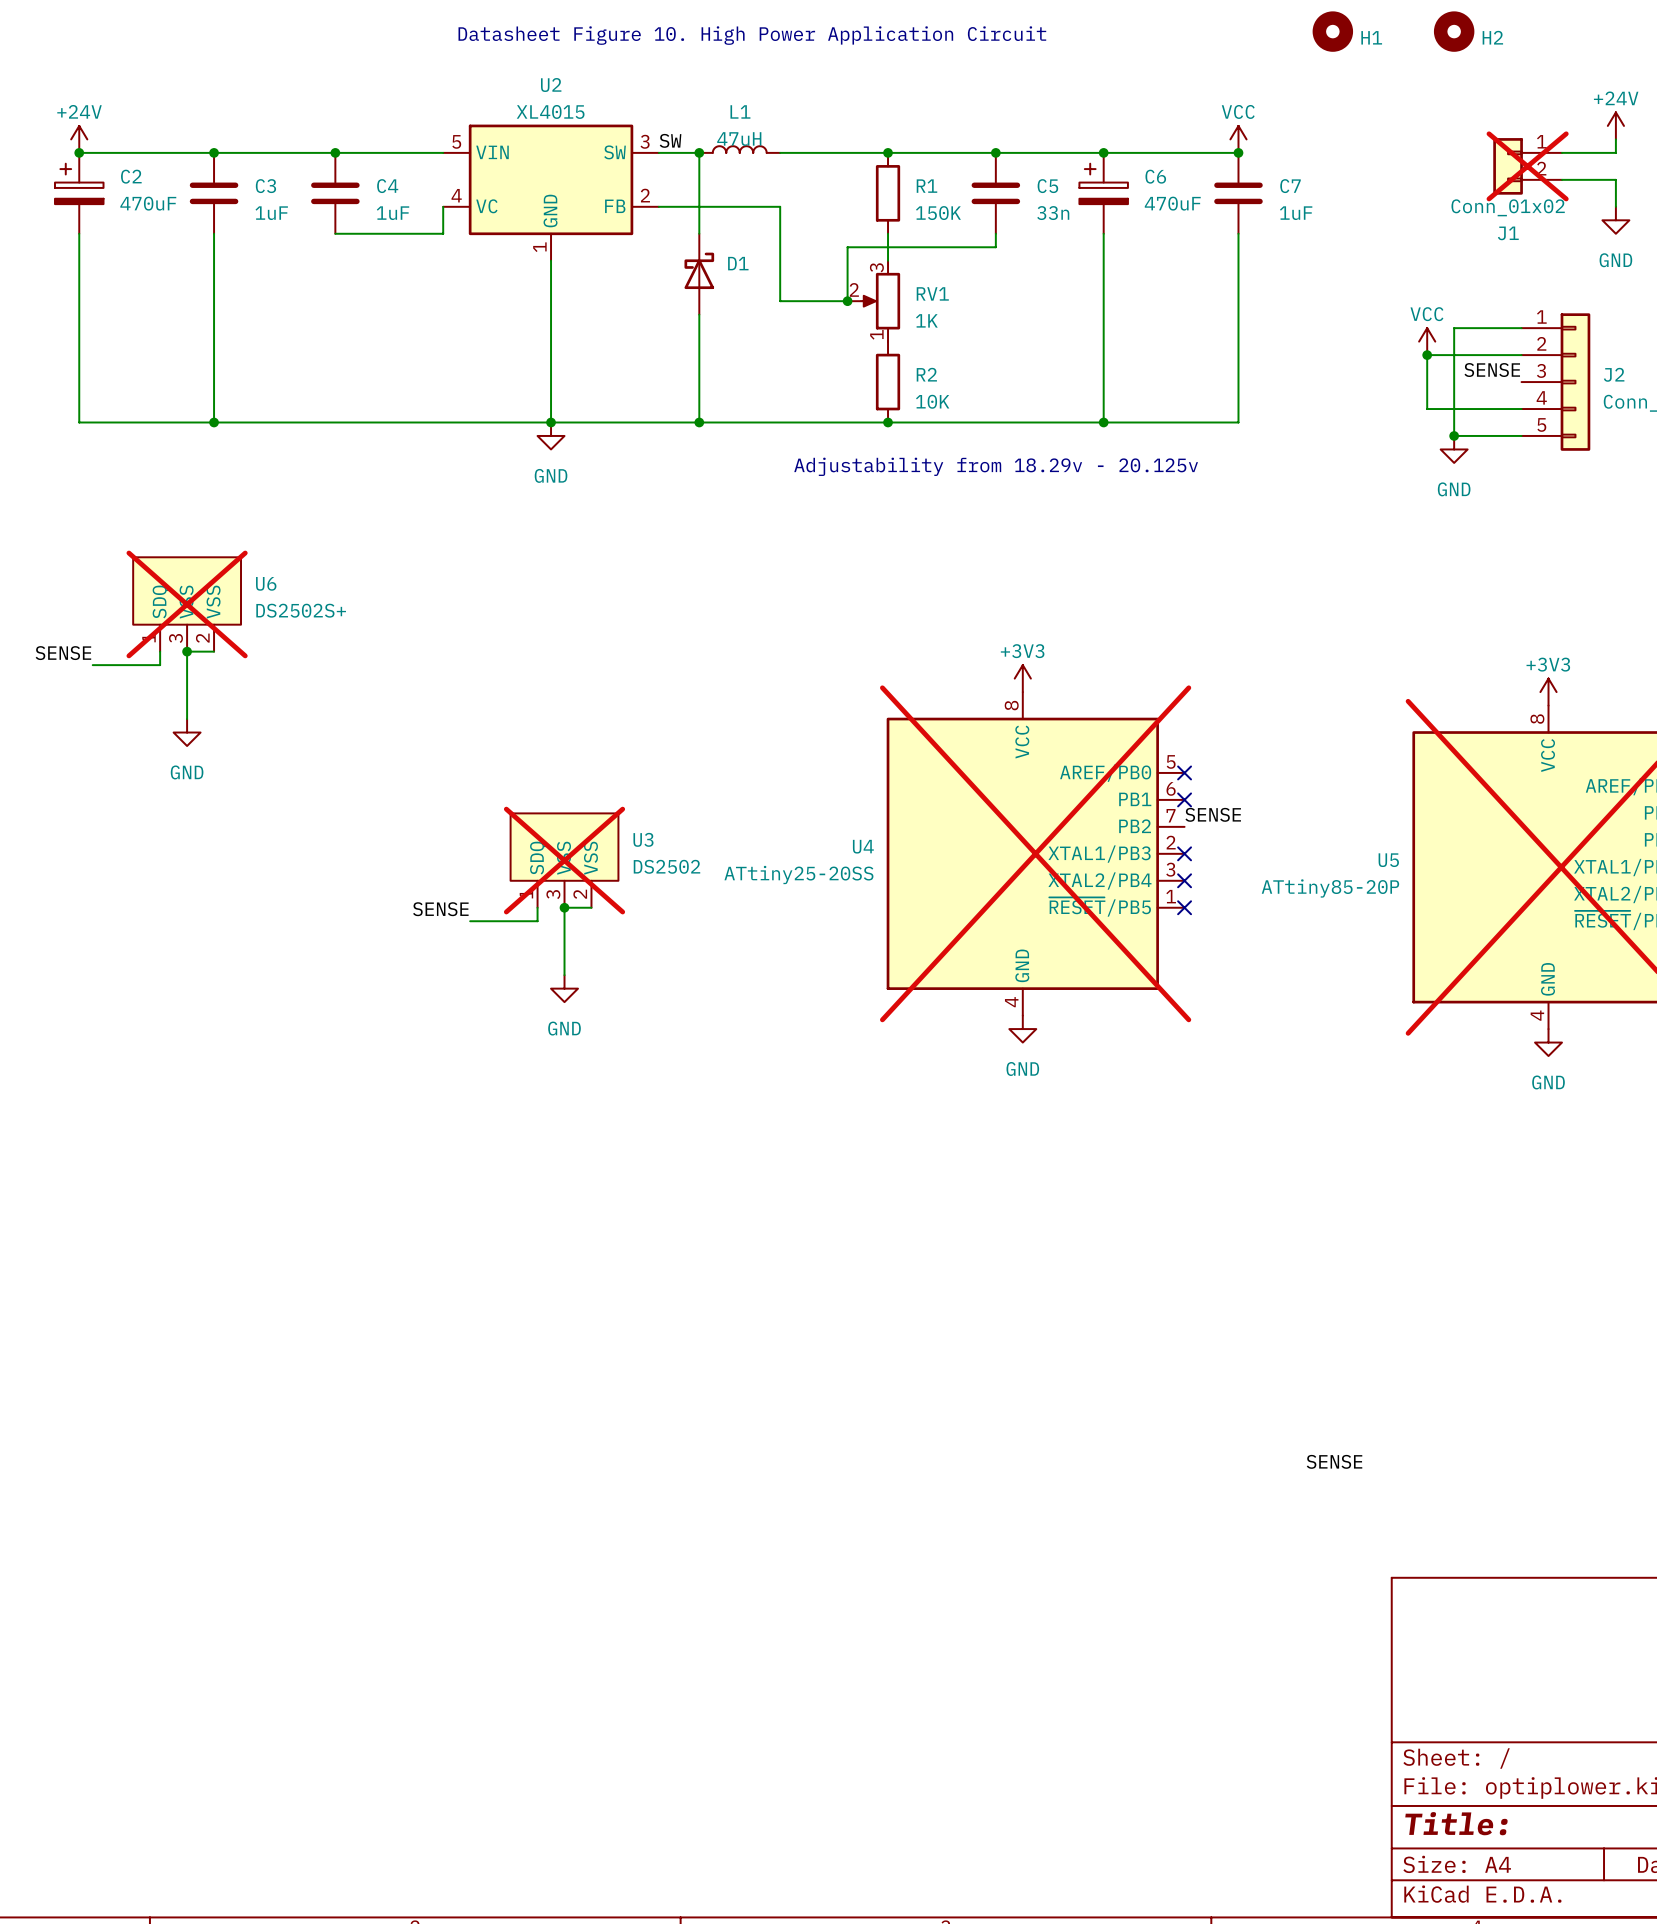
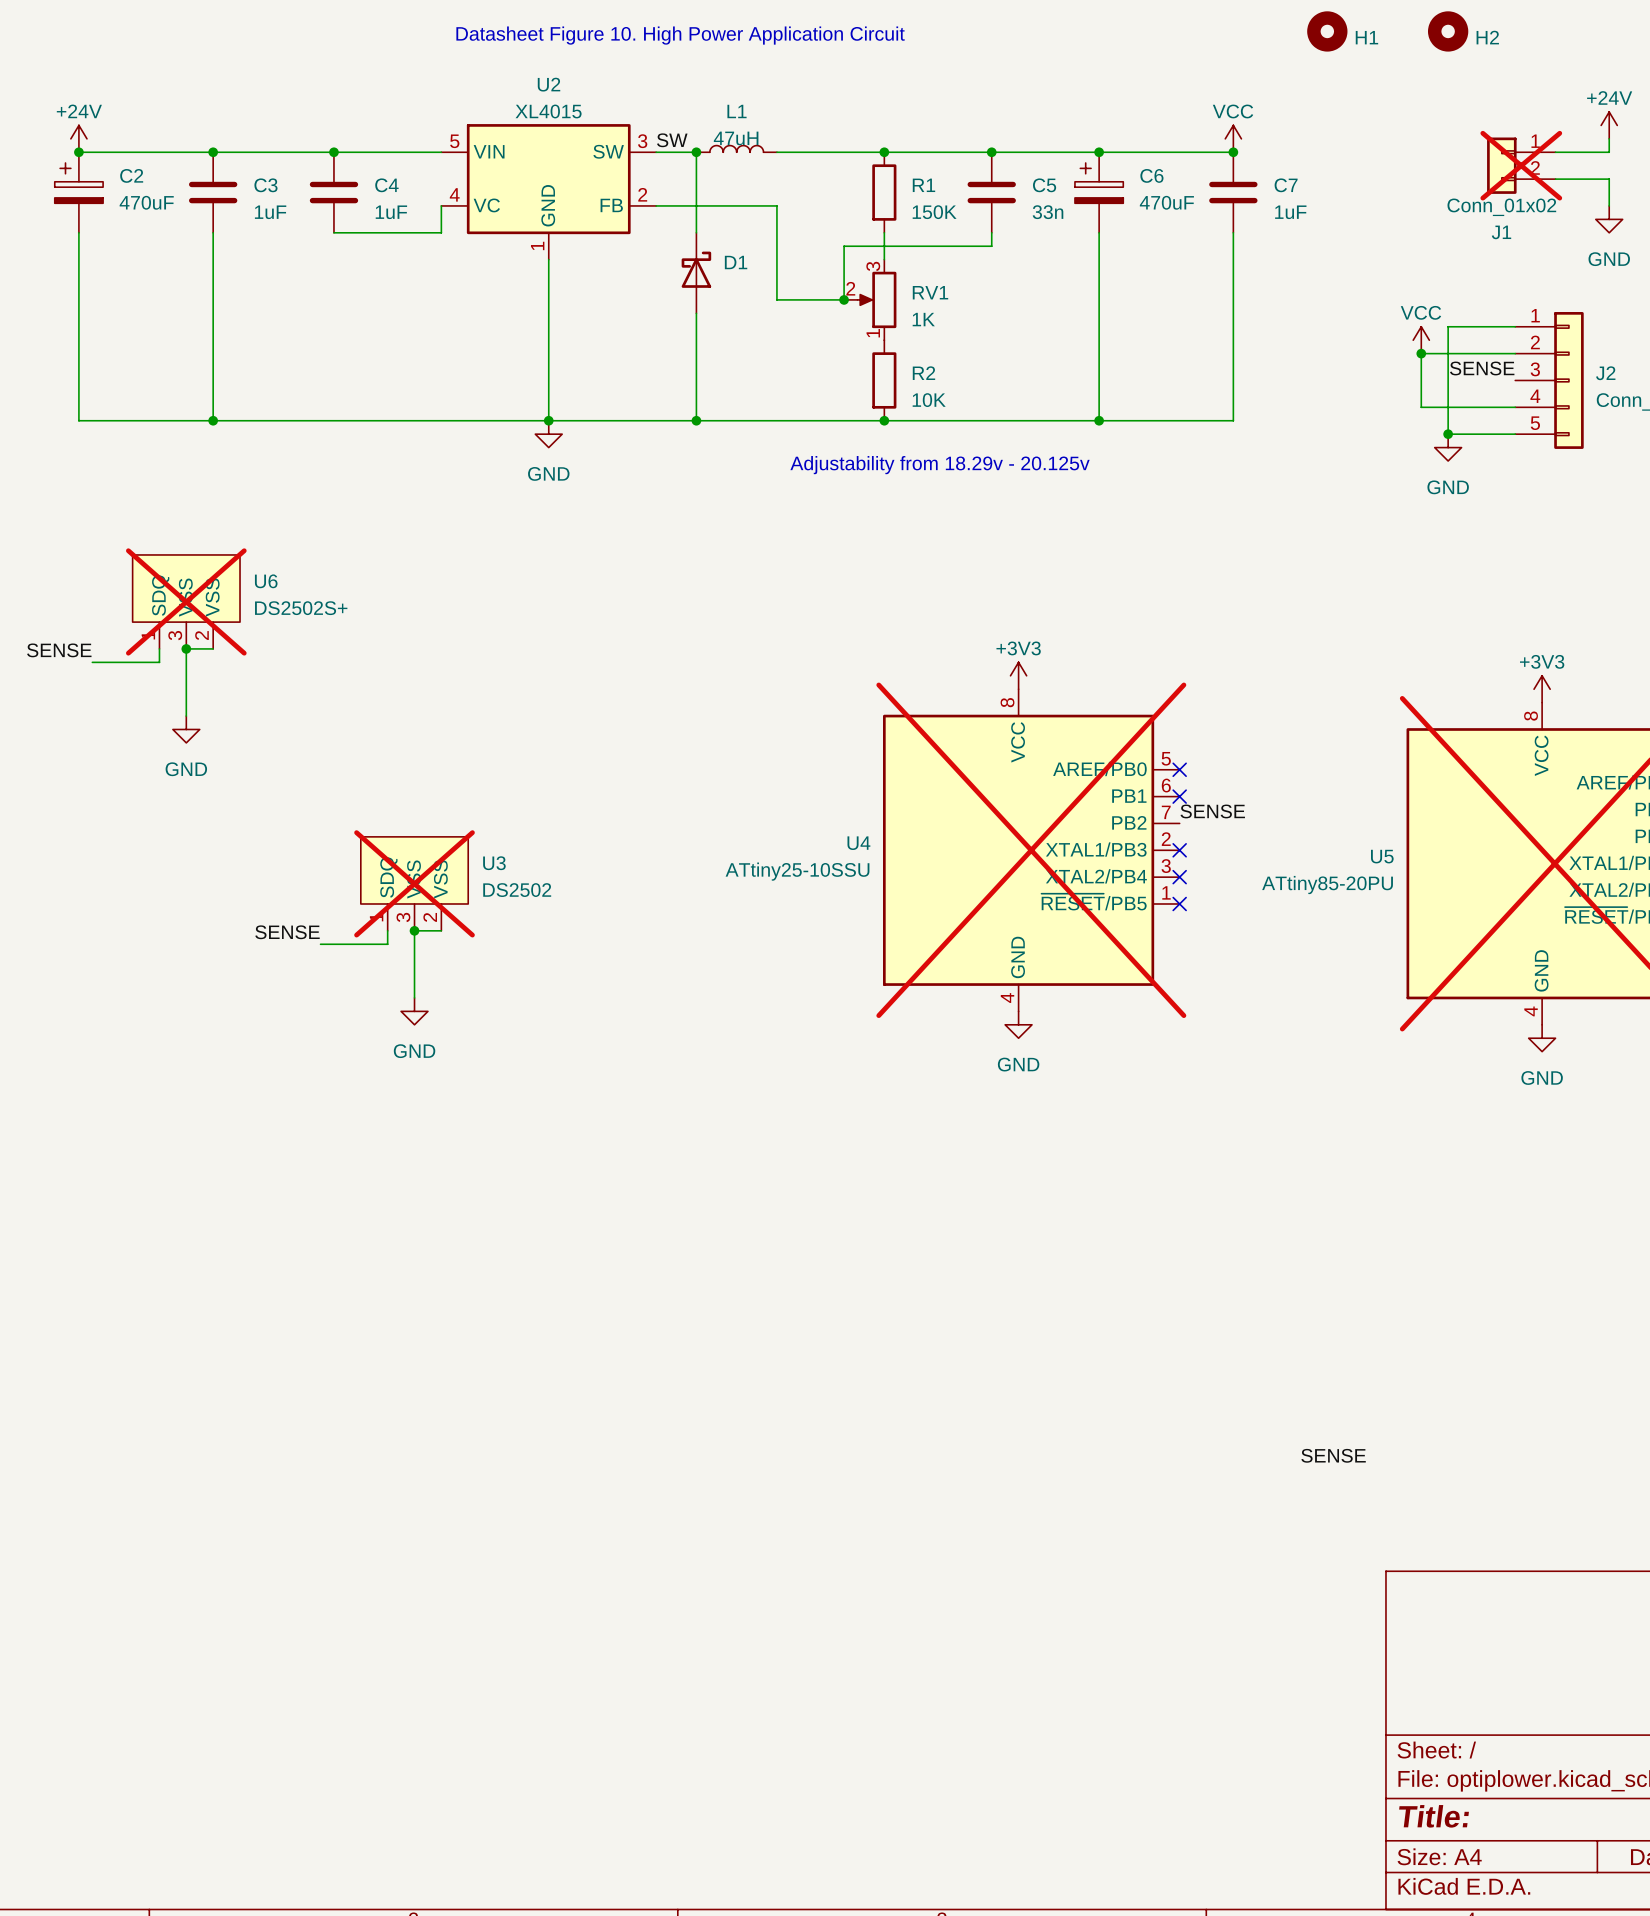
U3 position: (564, 860) -> (414, 883)
U4 value: ATtiny25-20SS (798, 874) -> ATtiny25-10SSU (797, 871)
U5 value: ATtiny85-20P (1330, 888) -> ATtiny85-20PU (1327, 885)
wire: (537, 907) (537, 921) (470, 921) -> (387, 930) (387, 944) (320, 944)
junction: (564, 907) -> none
wire: (591, 907) (564, 907) (564, 975) -> (441, 930) (414, 930) (414, 997)
label position: SENSE (440, 909) -> SENSE (287, 932)
junction: none -> (414, 930)
power symbol position: GND (564, 988) -> GND (414, 1011)

